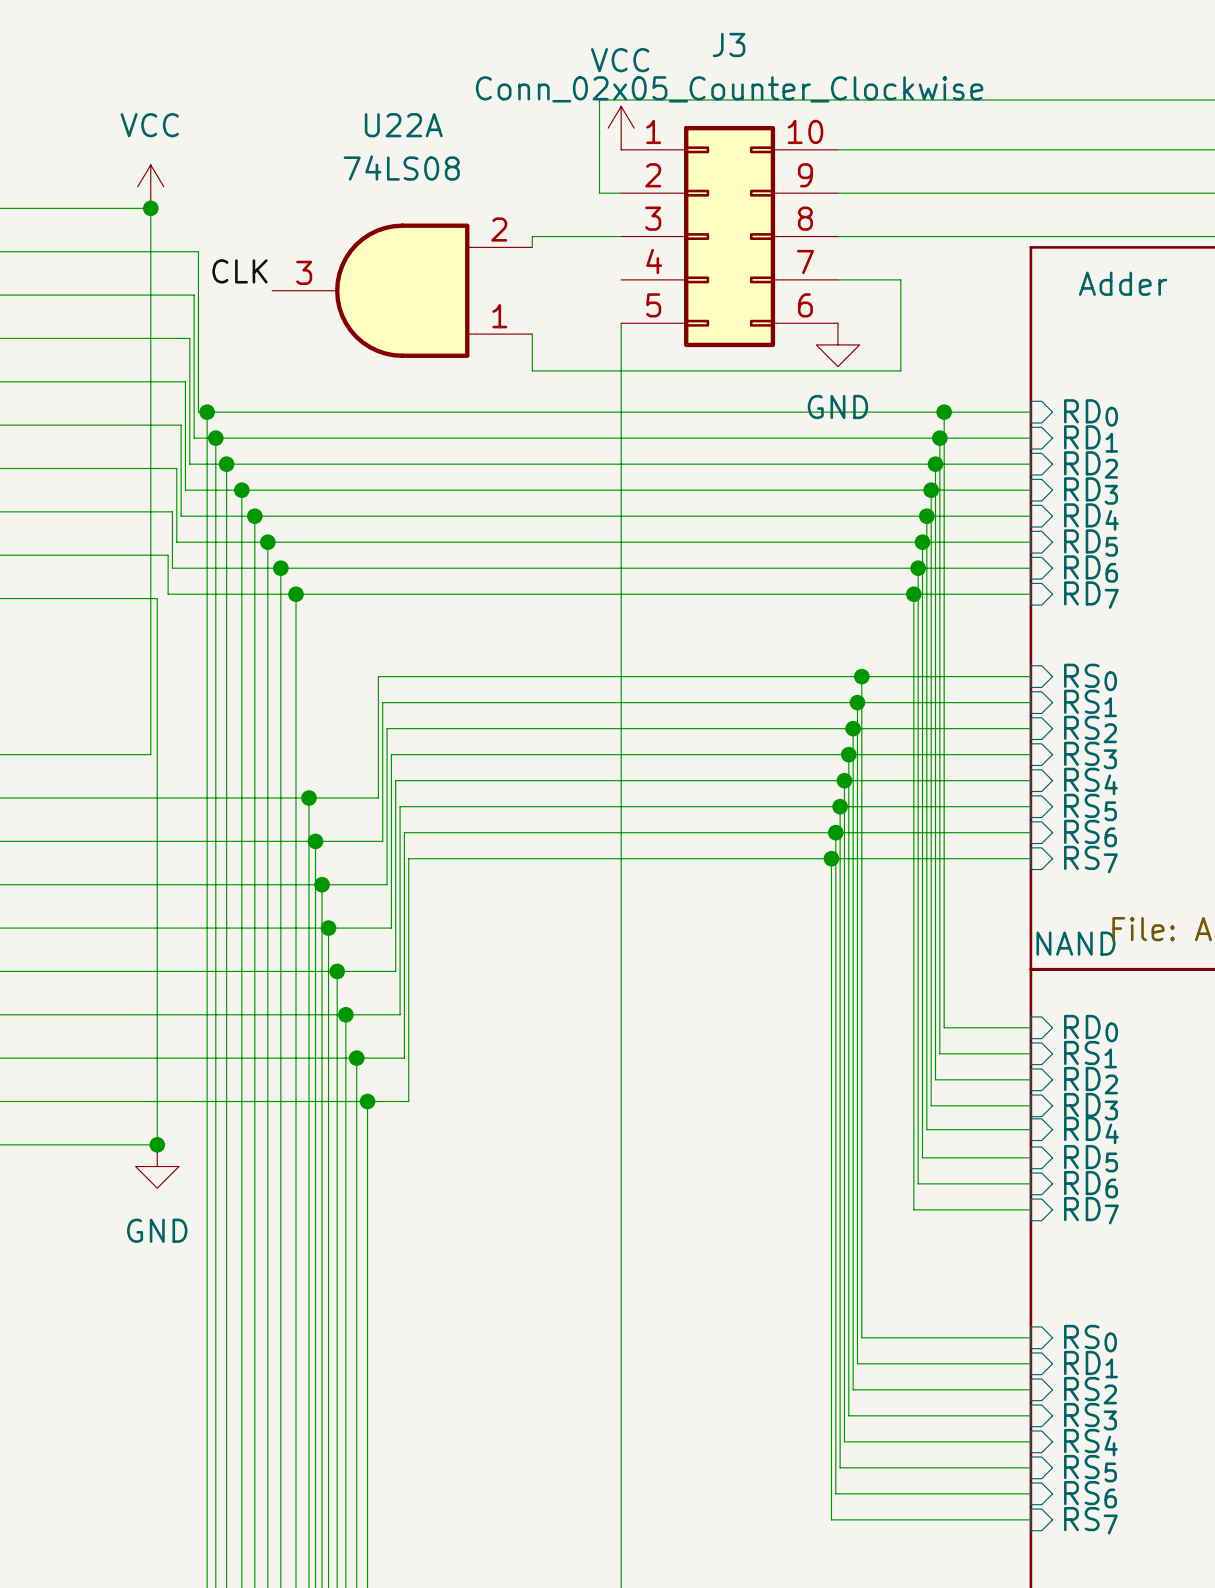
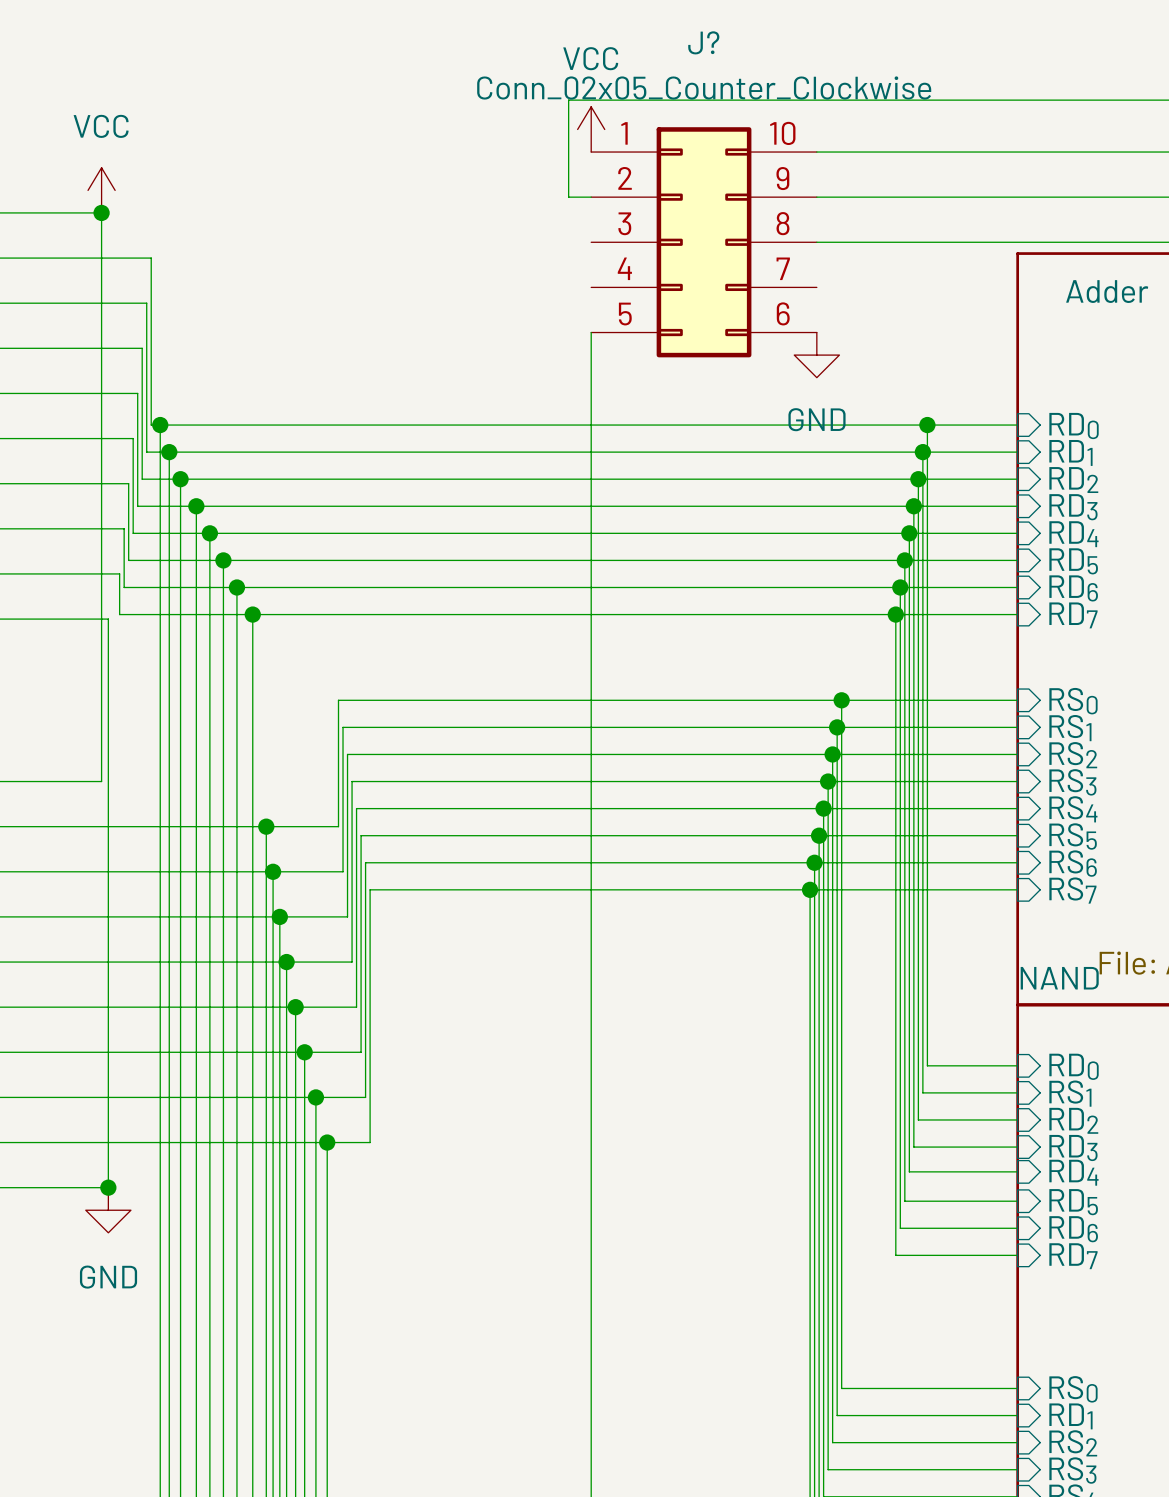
J3 name: J3 (729, 44) -> J? (703, 42)
wire: (621, 236) (532, 236) (532, 247) -> none
label: CLK (240, 271) -> none
wire: (837, 279) (900, 279) (900, 370) (532, 370) (532, 334) -> none
U22A: 74LS08 (402, 290) -> none

